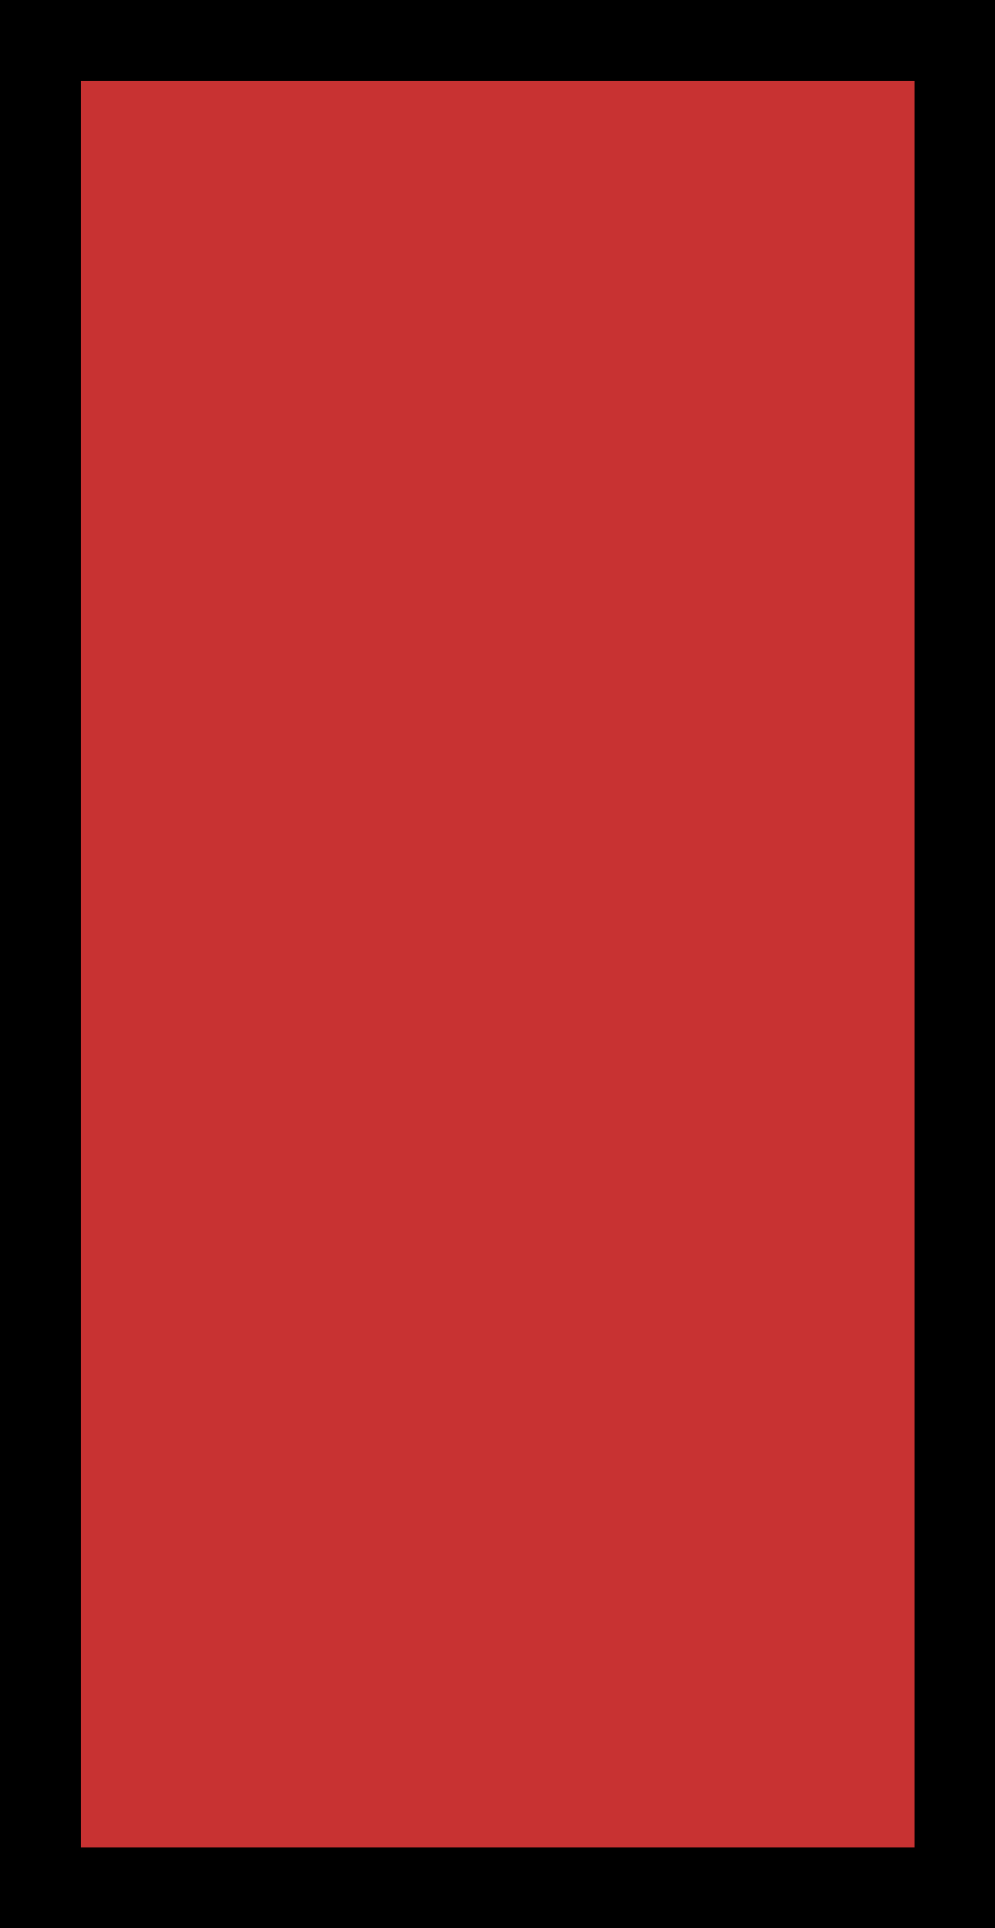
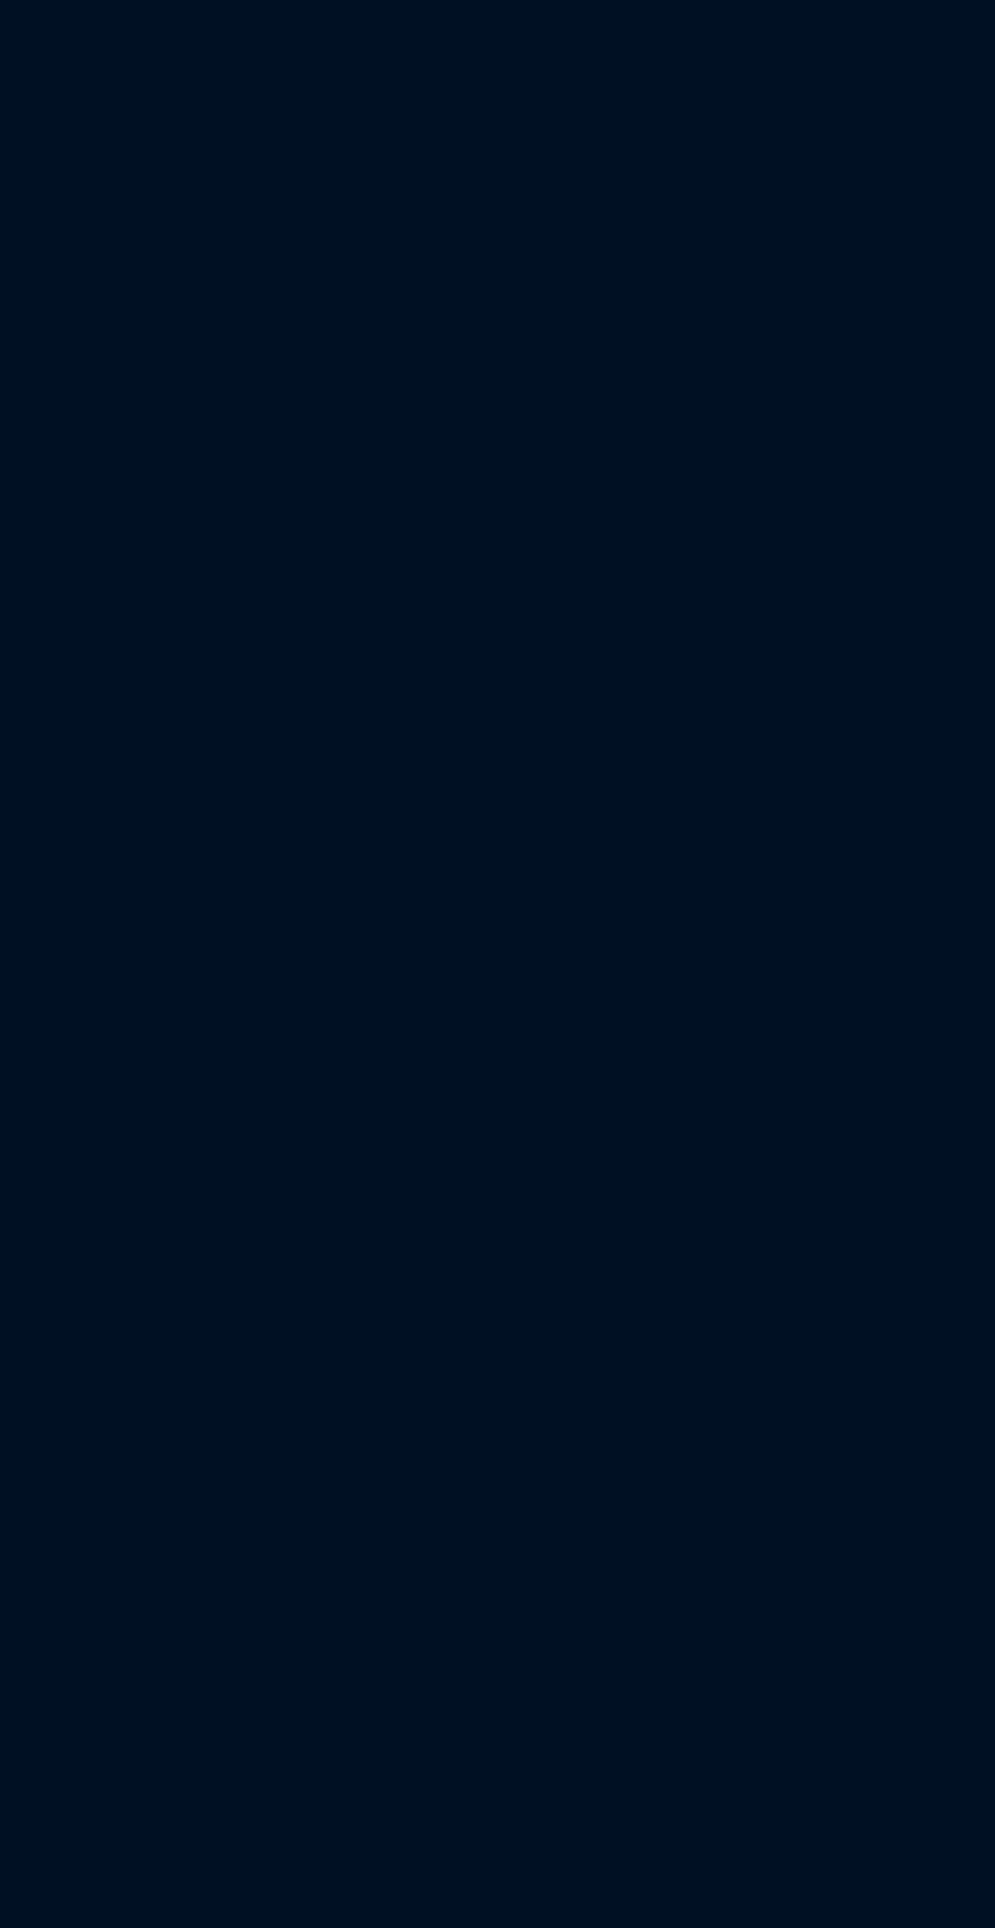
drawing: [80, 80, 915, 1848] -> none

